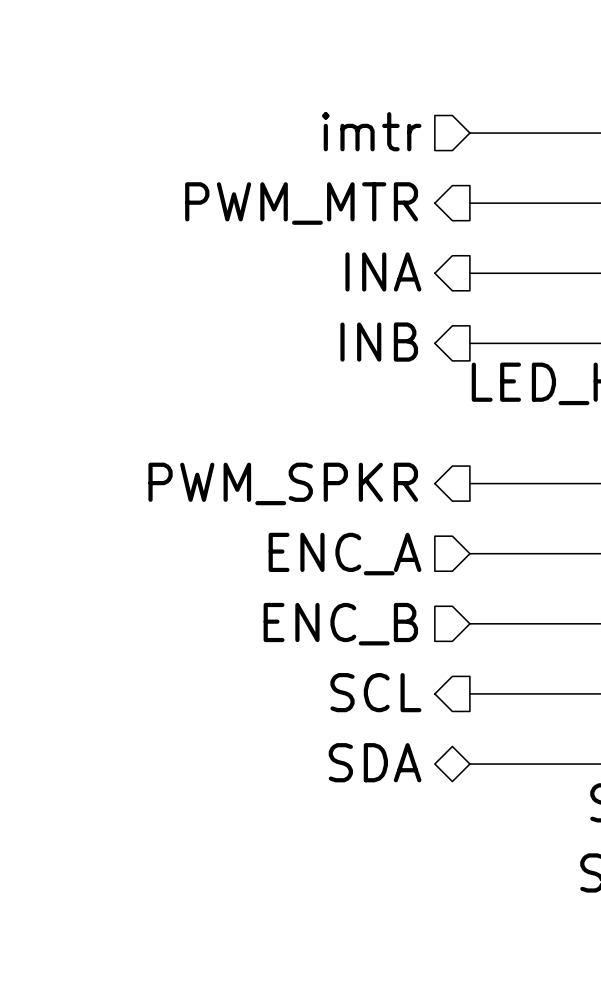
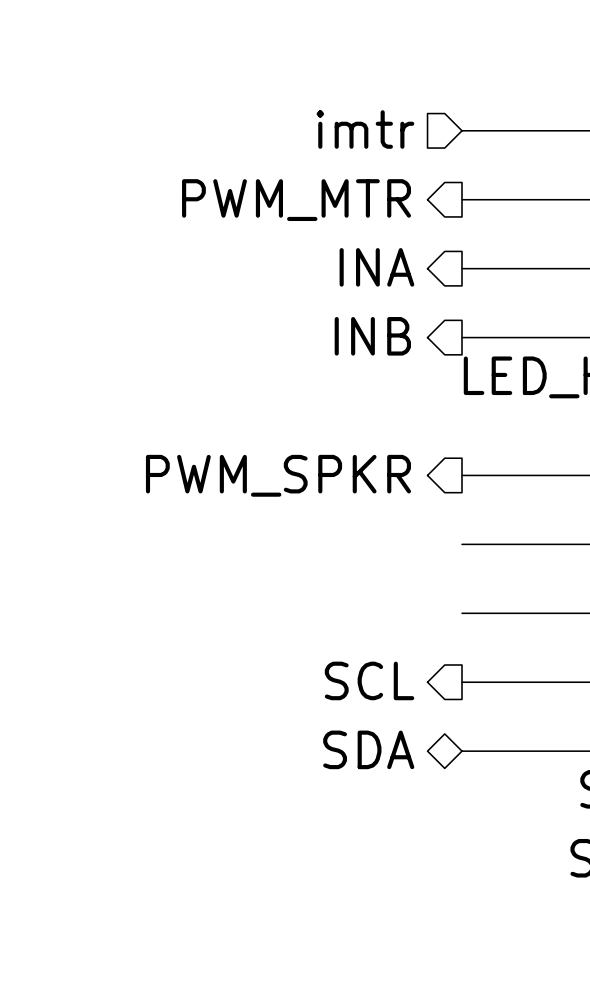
hierarchical label: ENC_A (345, 554) -> none
hierarchical label: ENC_B (340, 624) -> none

